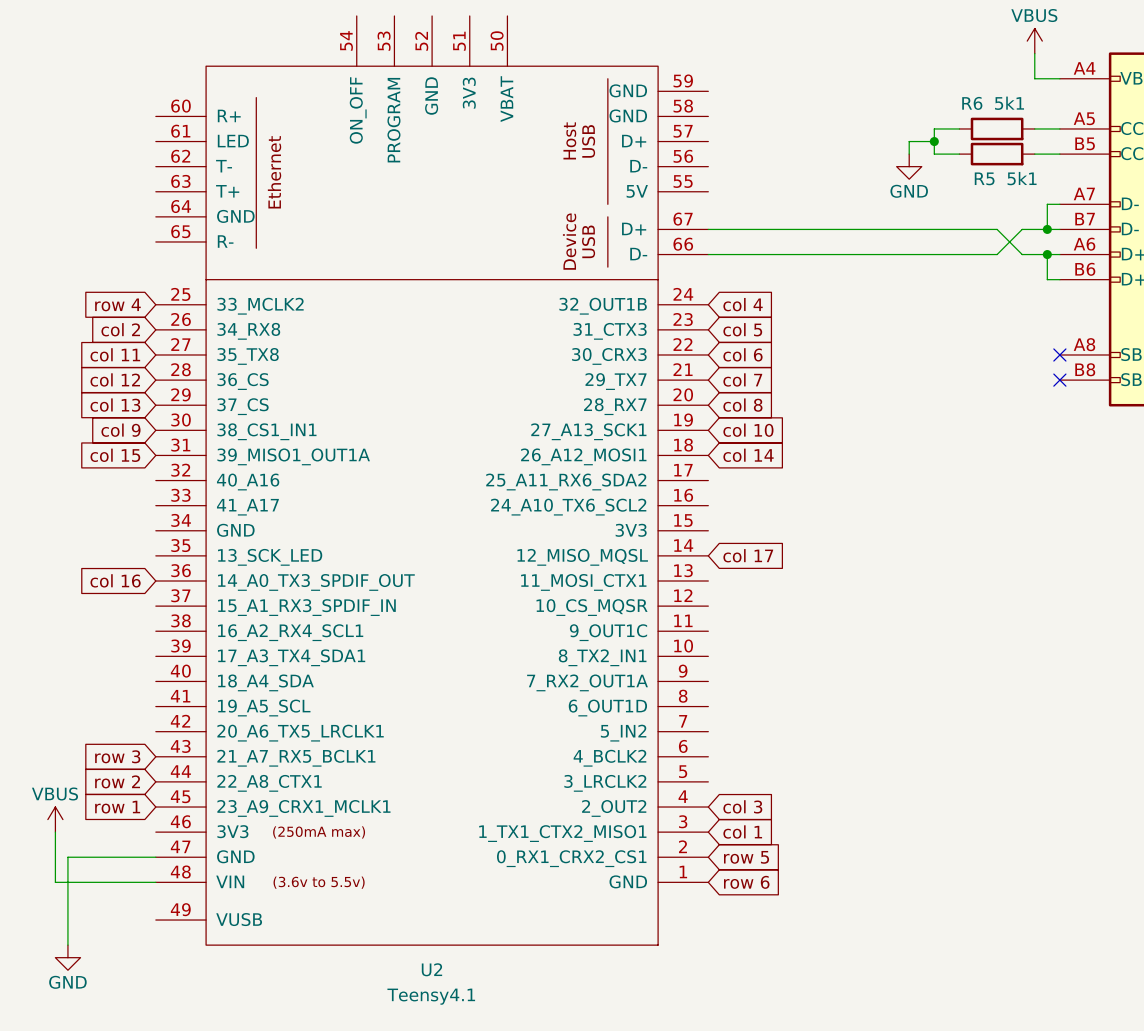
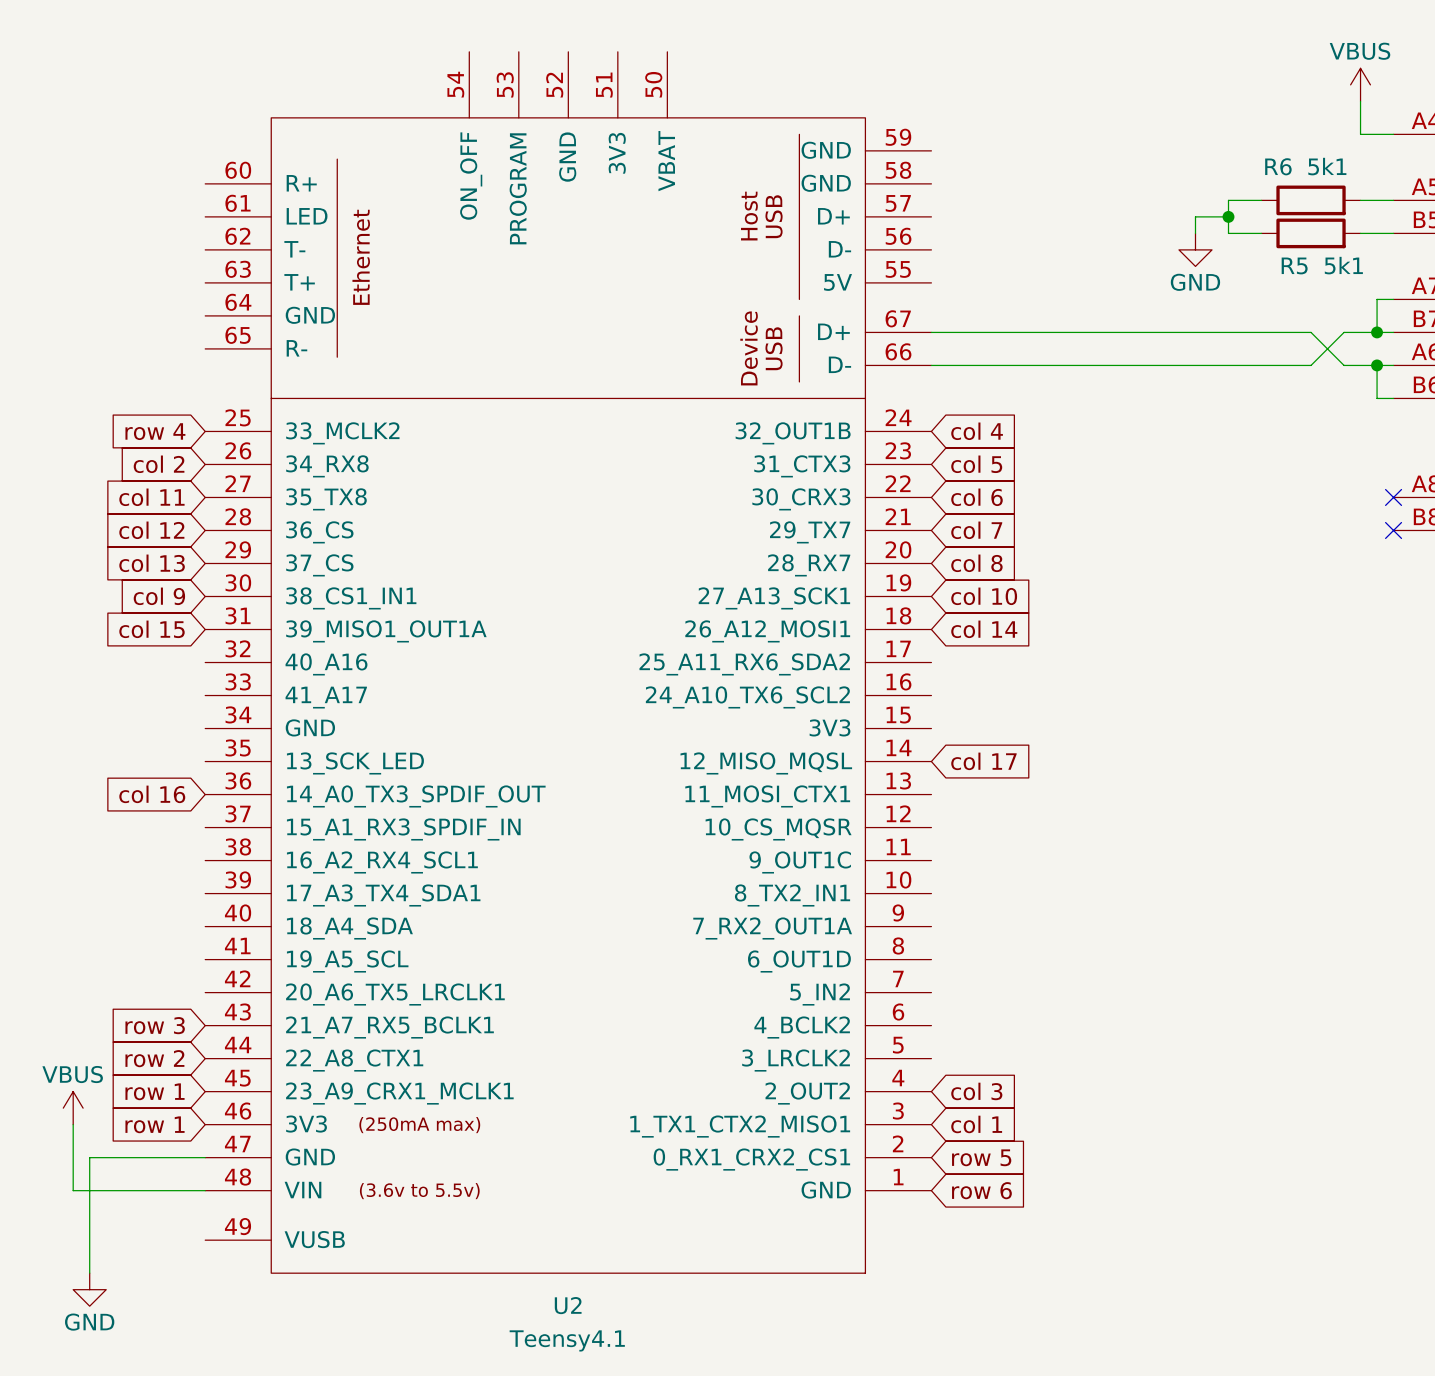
global label: none -> row 1 (155, 1124)

